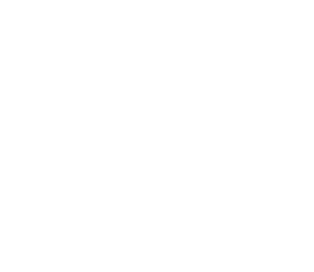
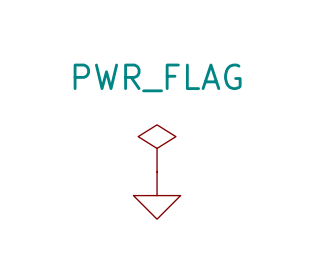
power symbol: none -> PWR_FLAG (157, 148)
power symbol: none -> (157, 195)

